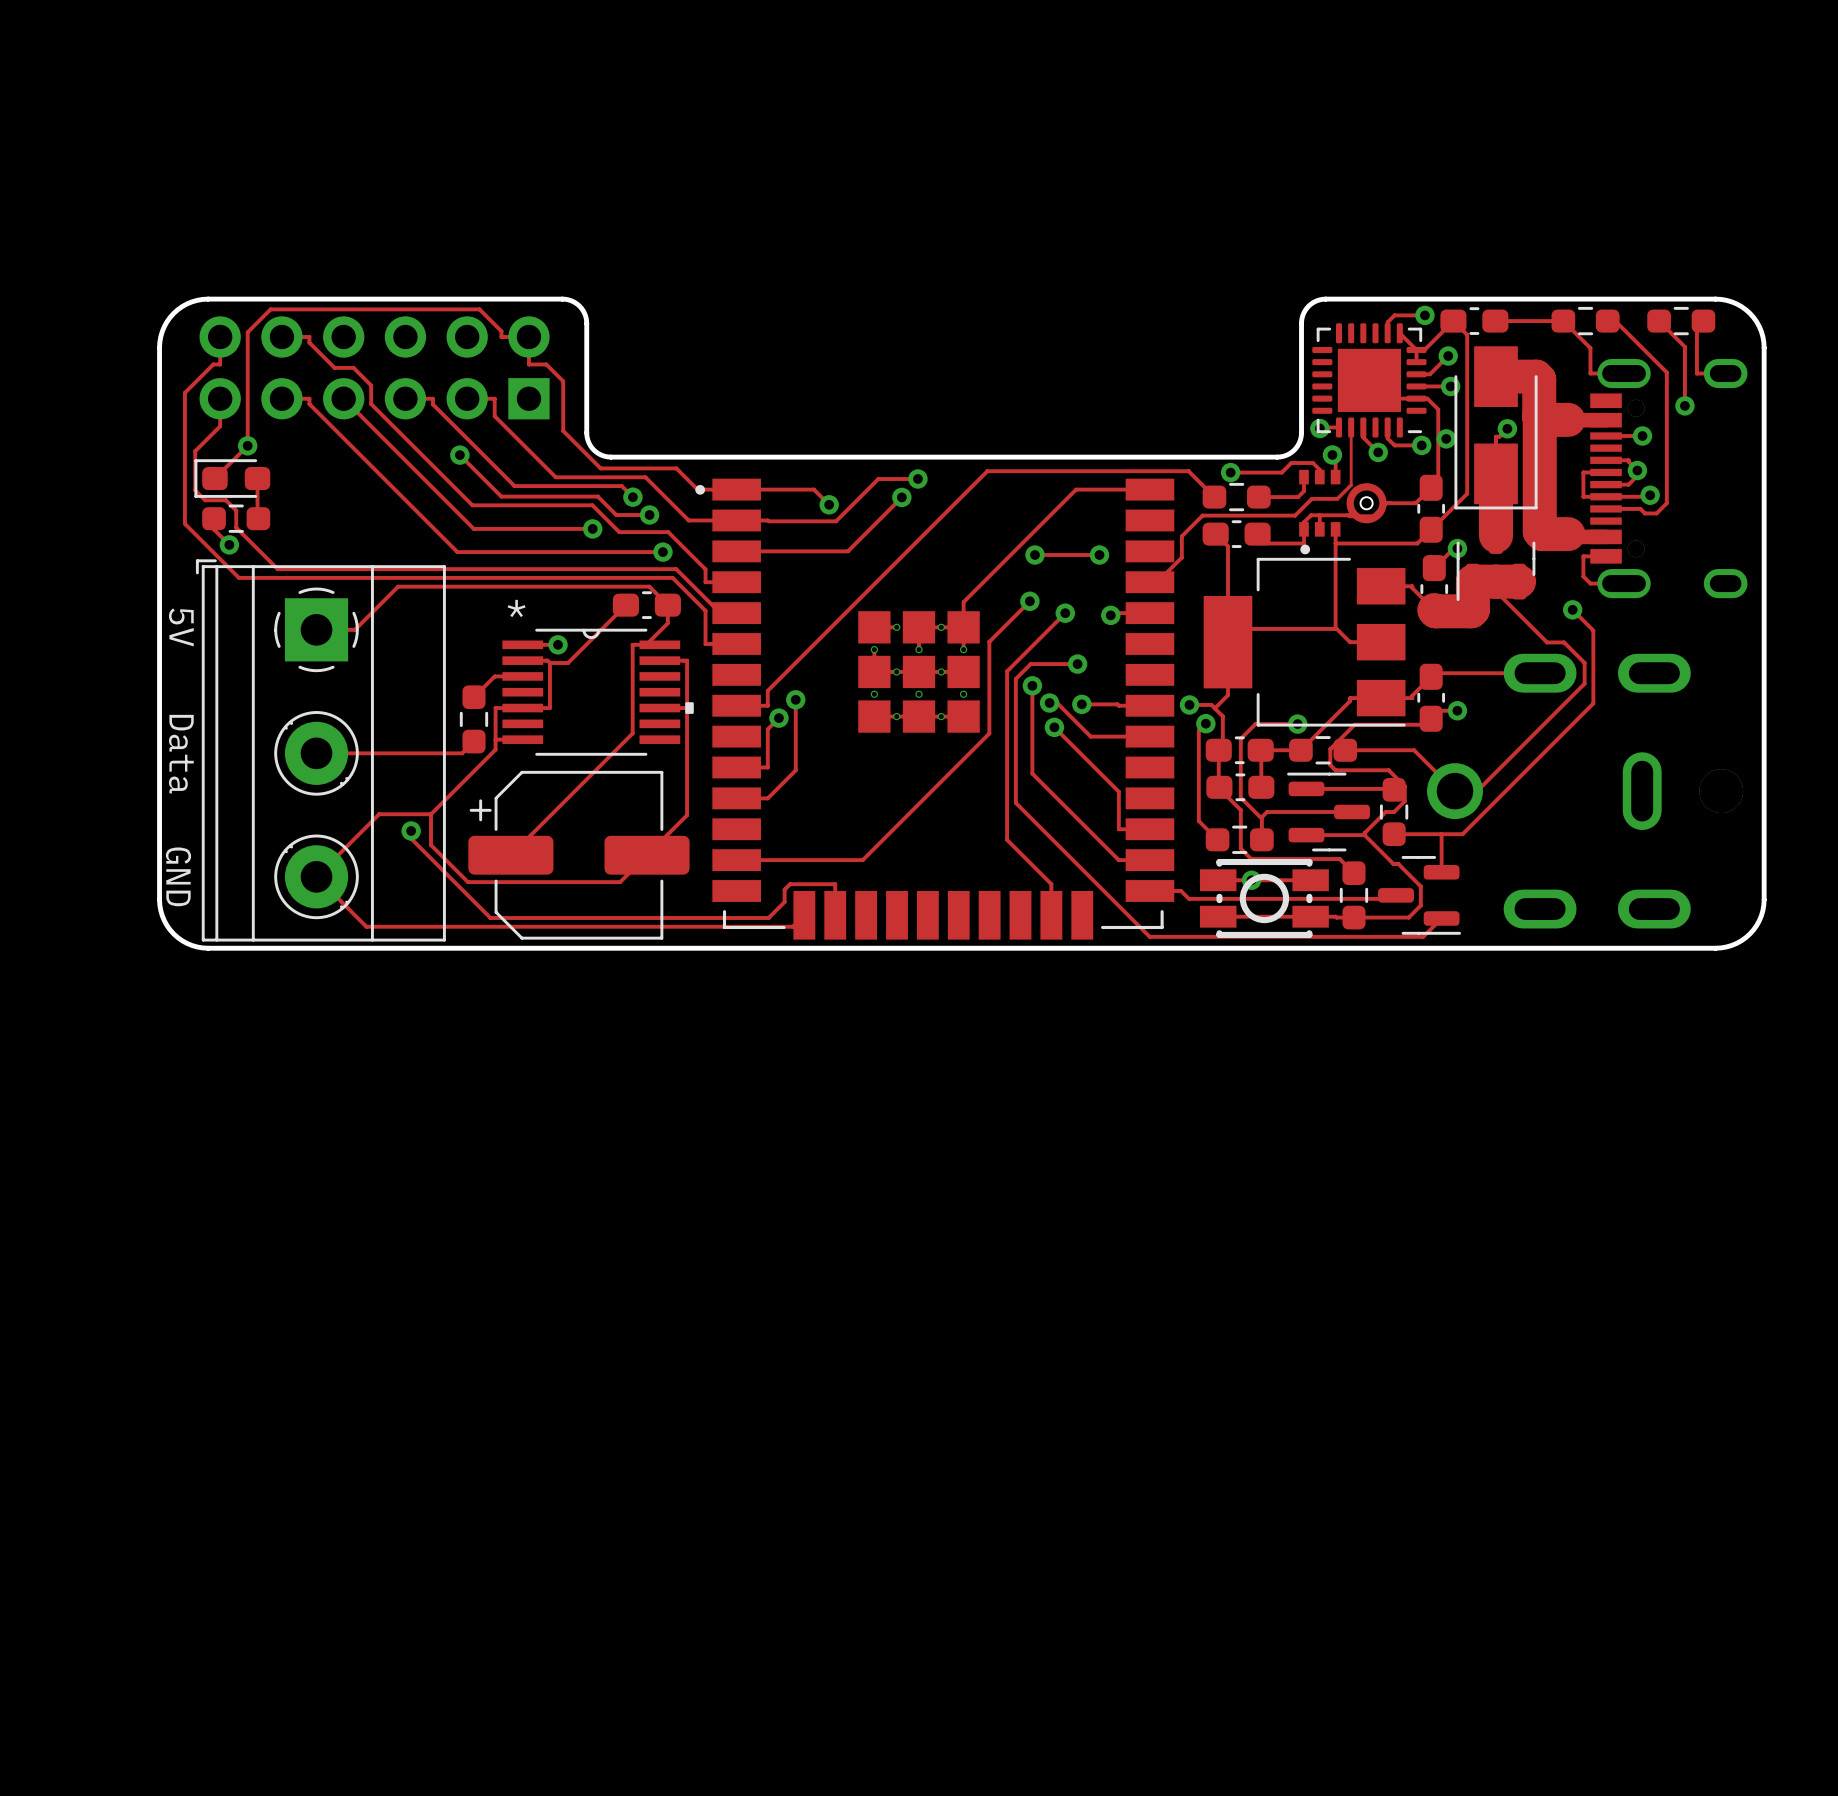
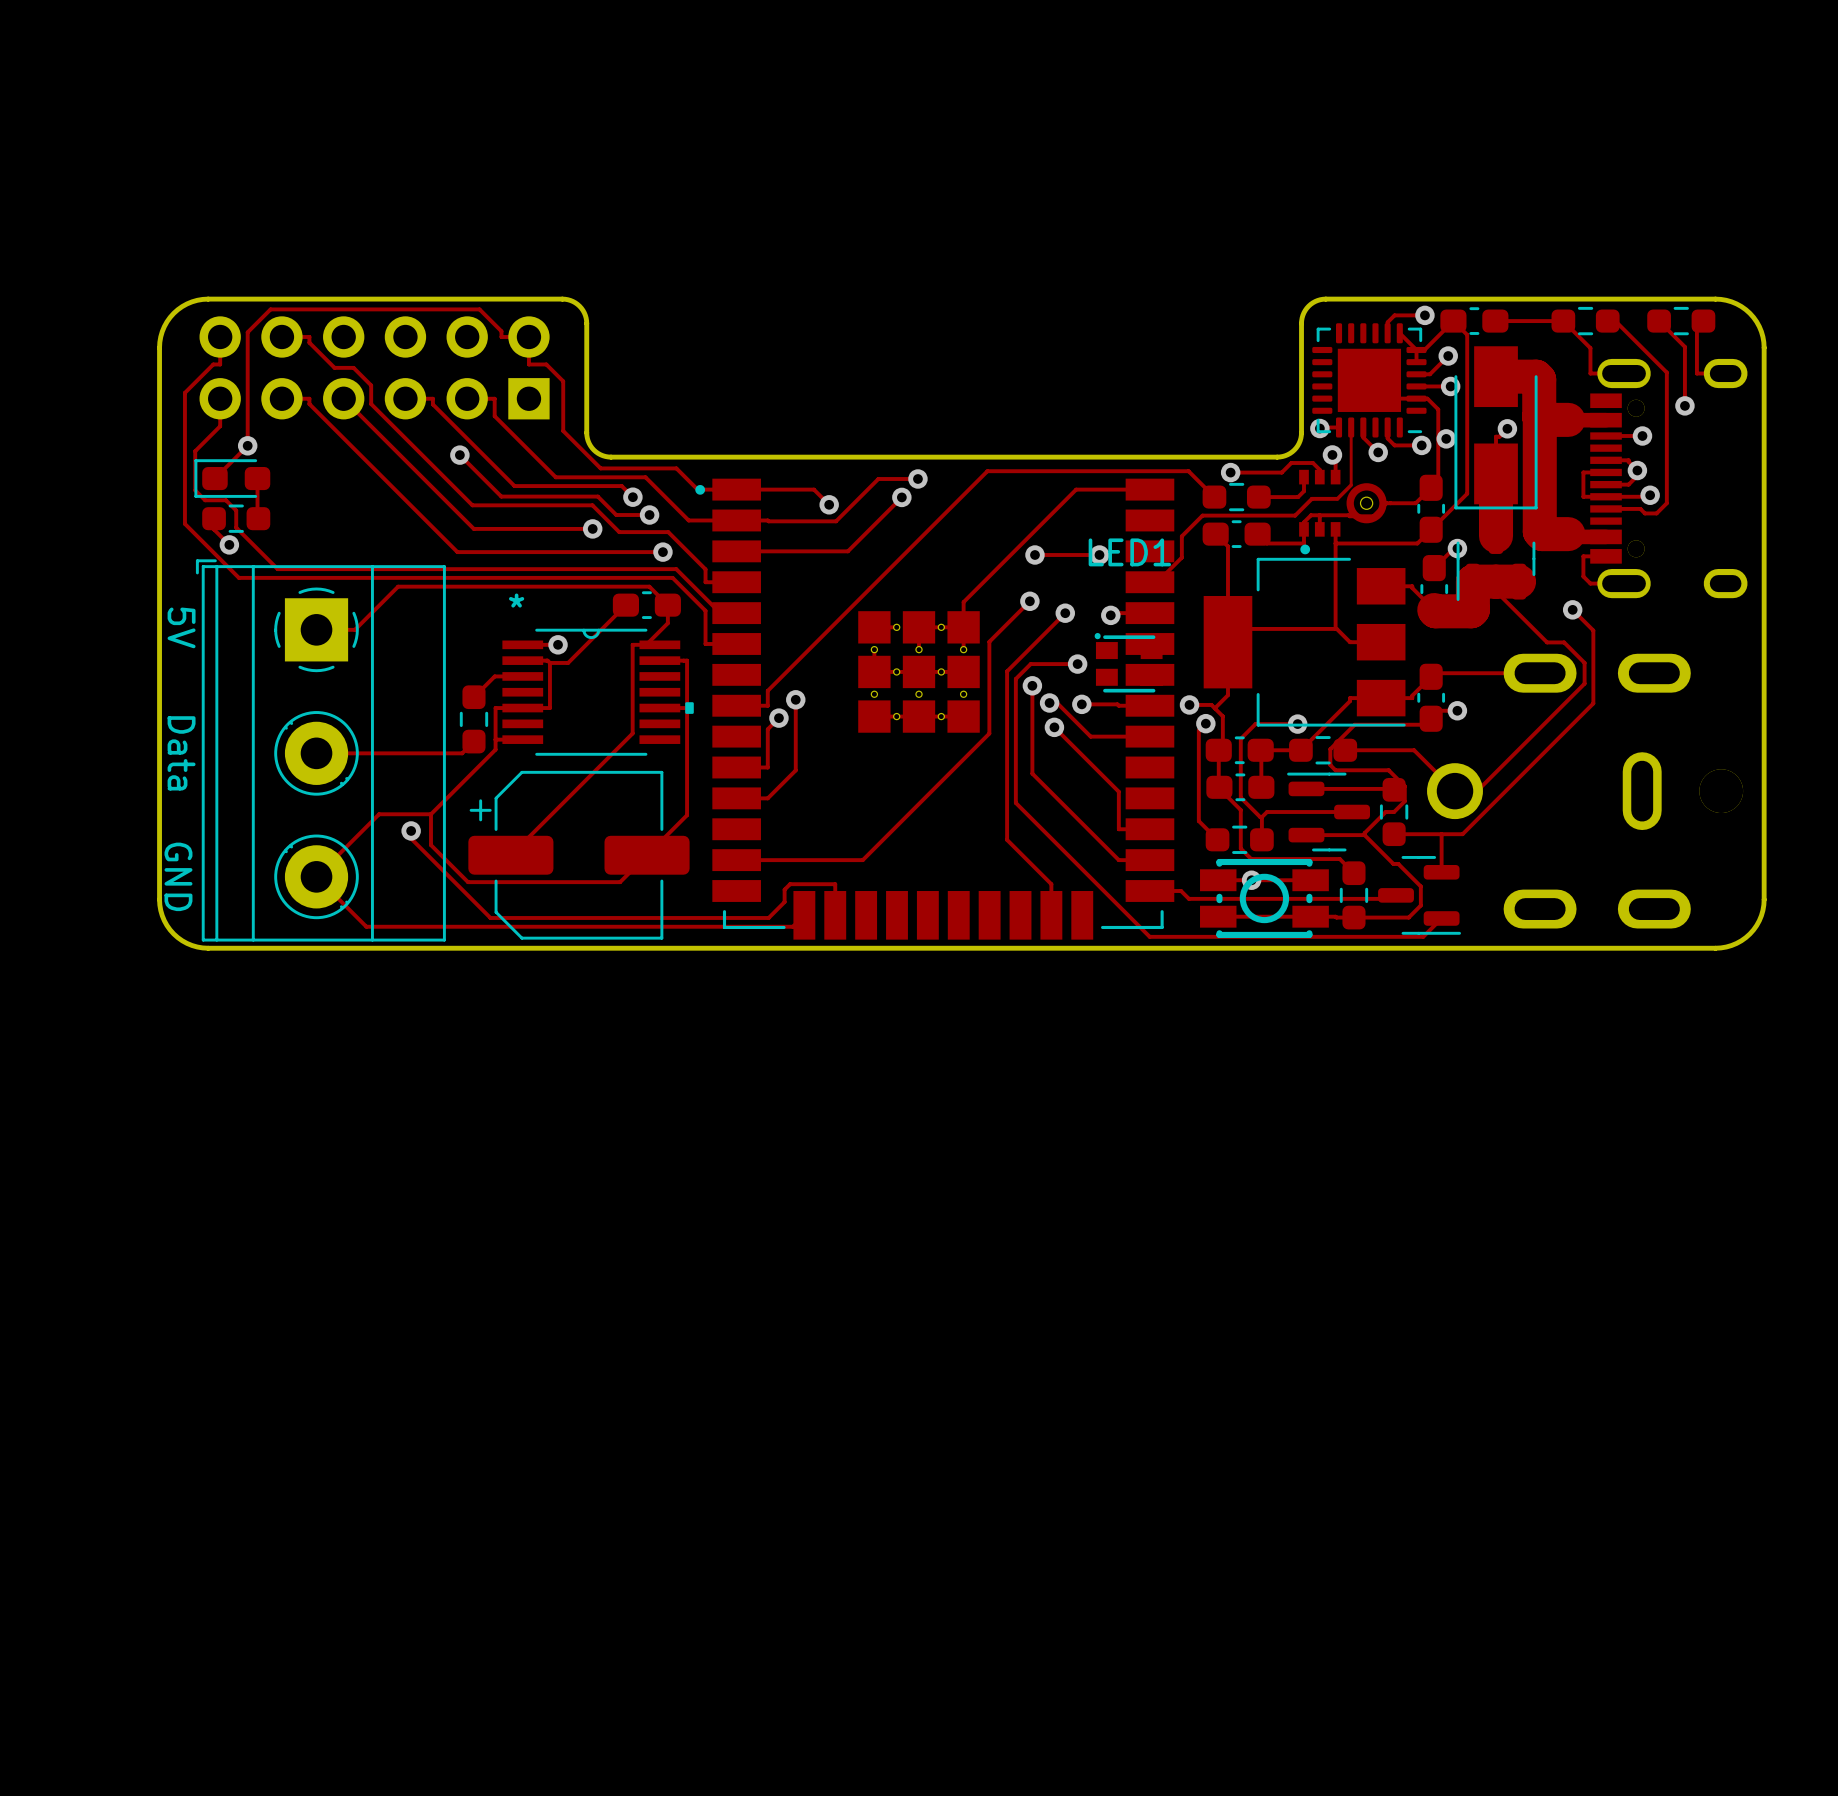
LED1: none -> (1128, 662)

